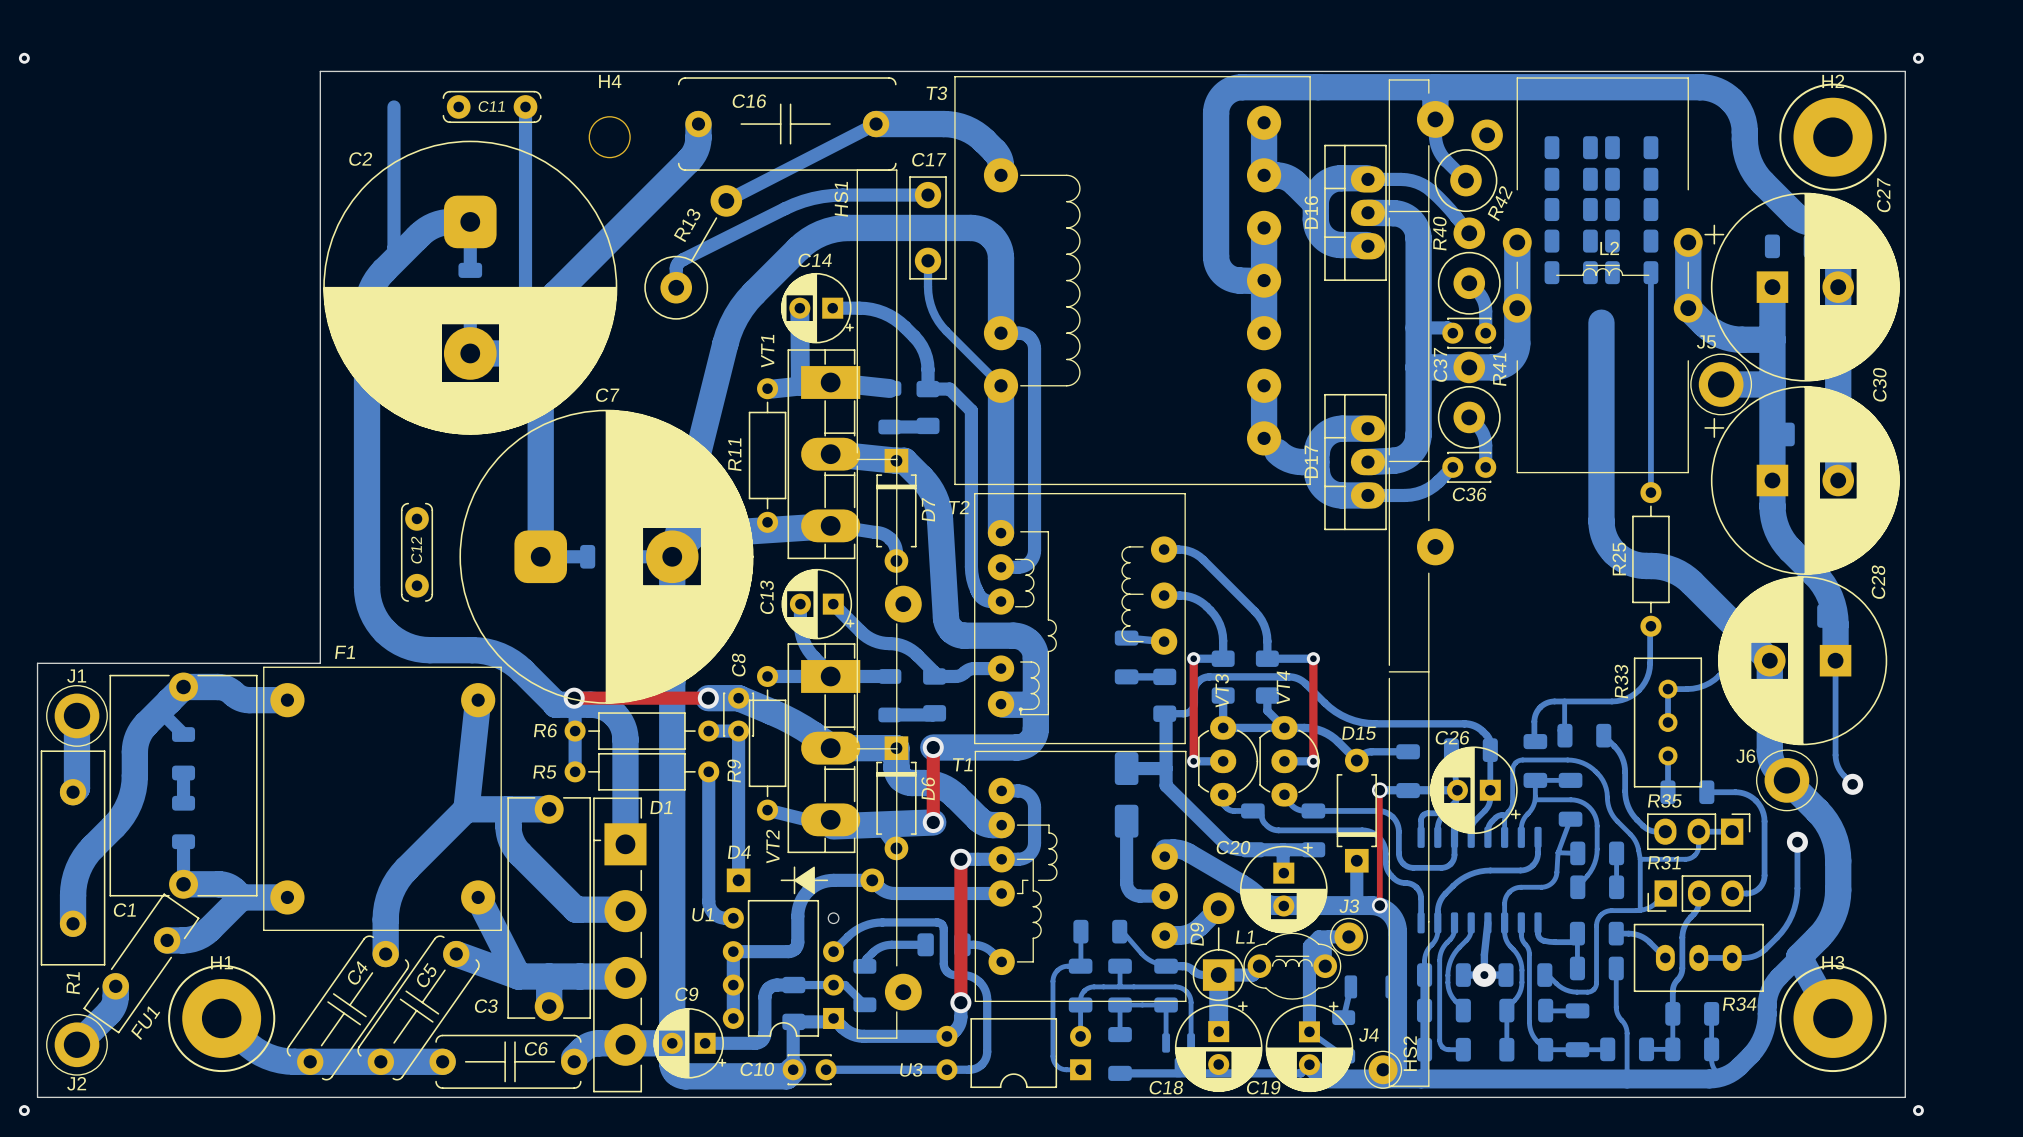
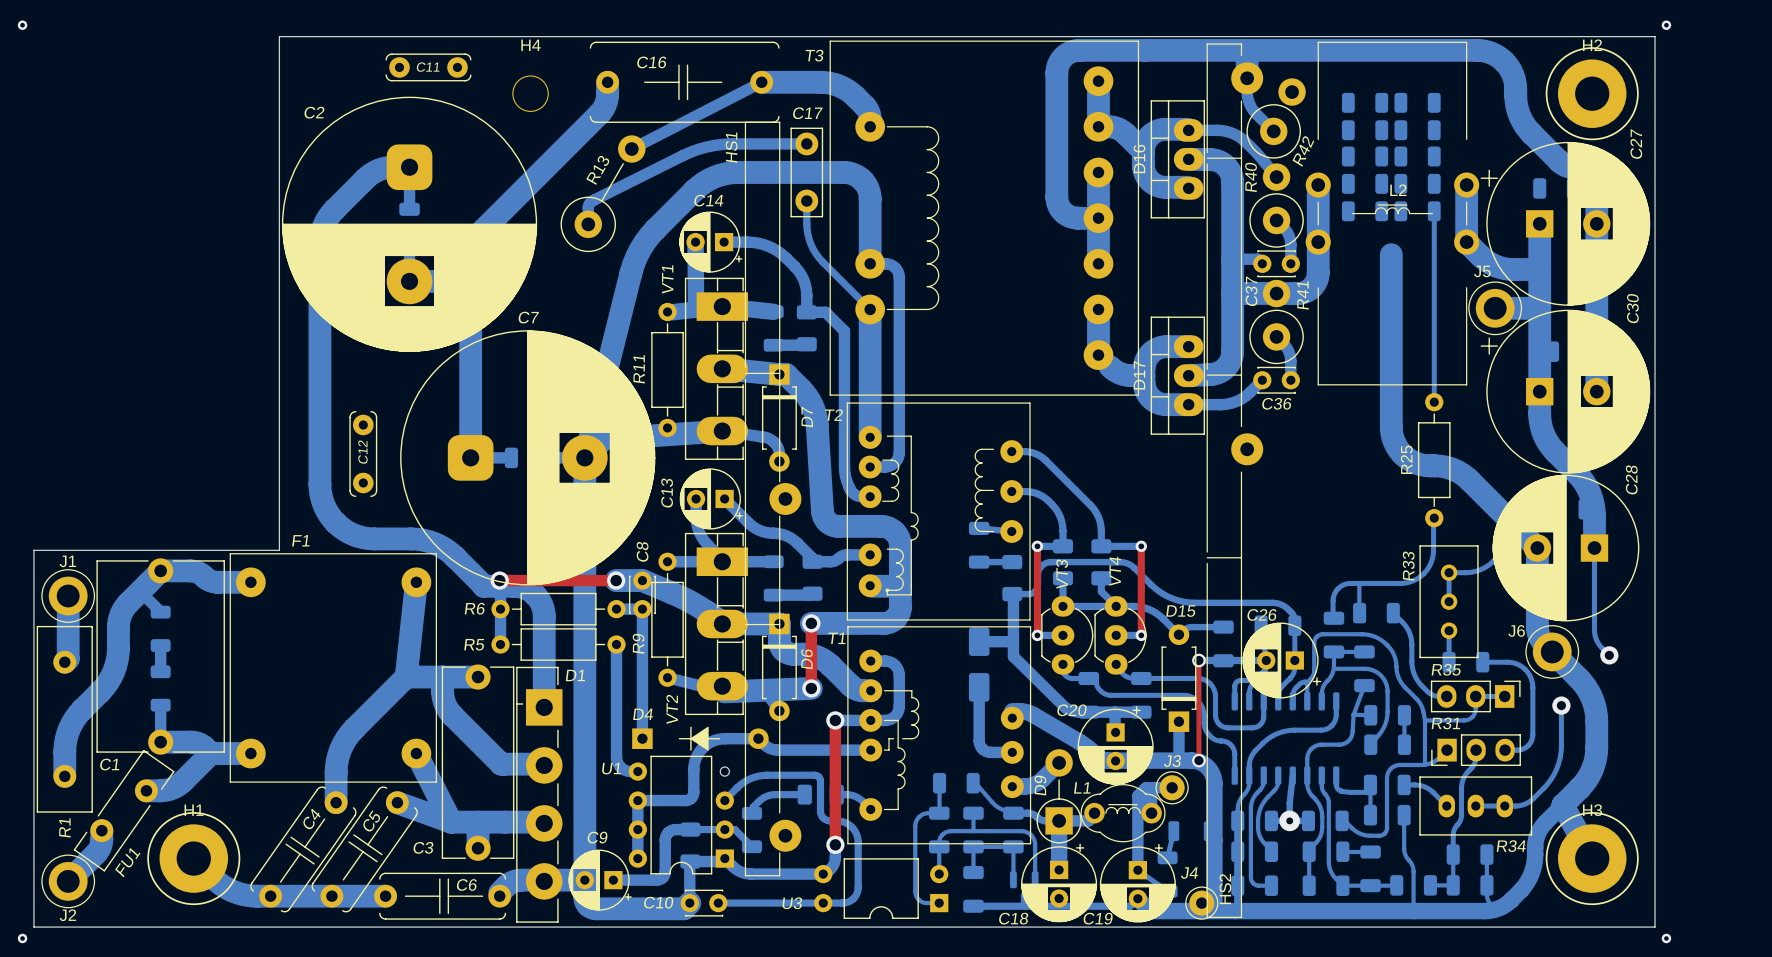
bottom track: (393, 106) (393, 247) (400, 254) -> none
bottom track: (525, 106) (525, 349) -> none

